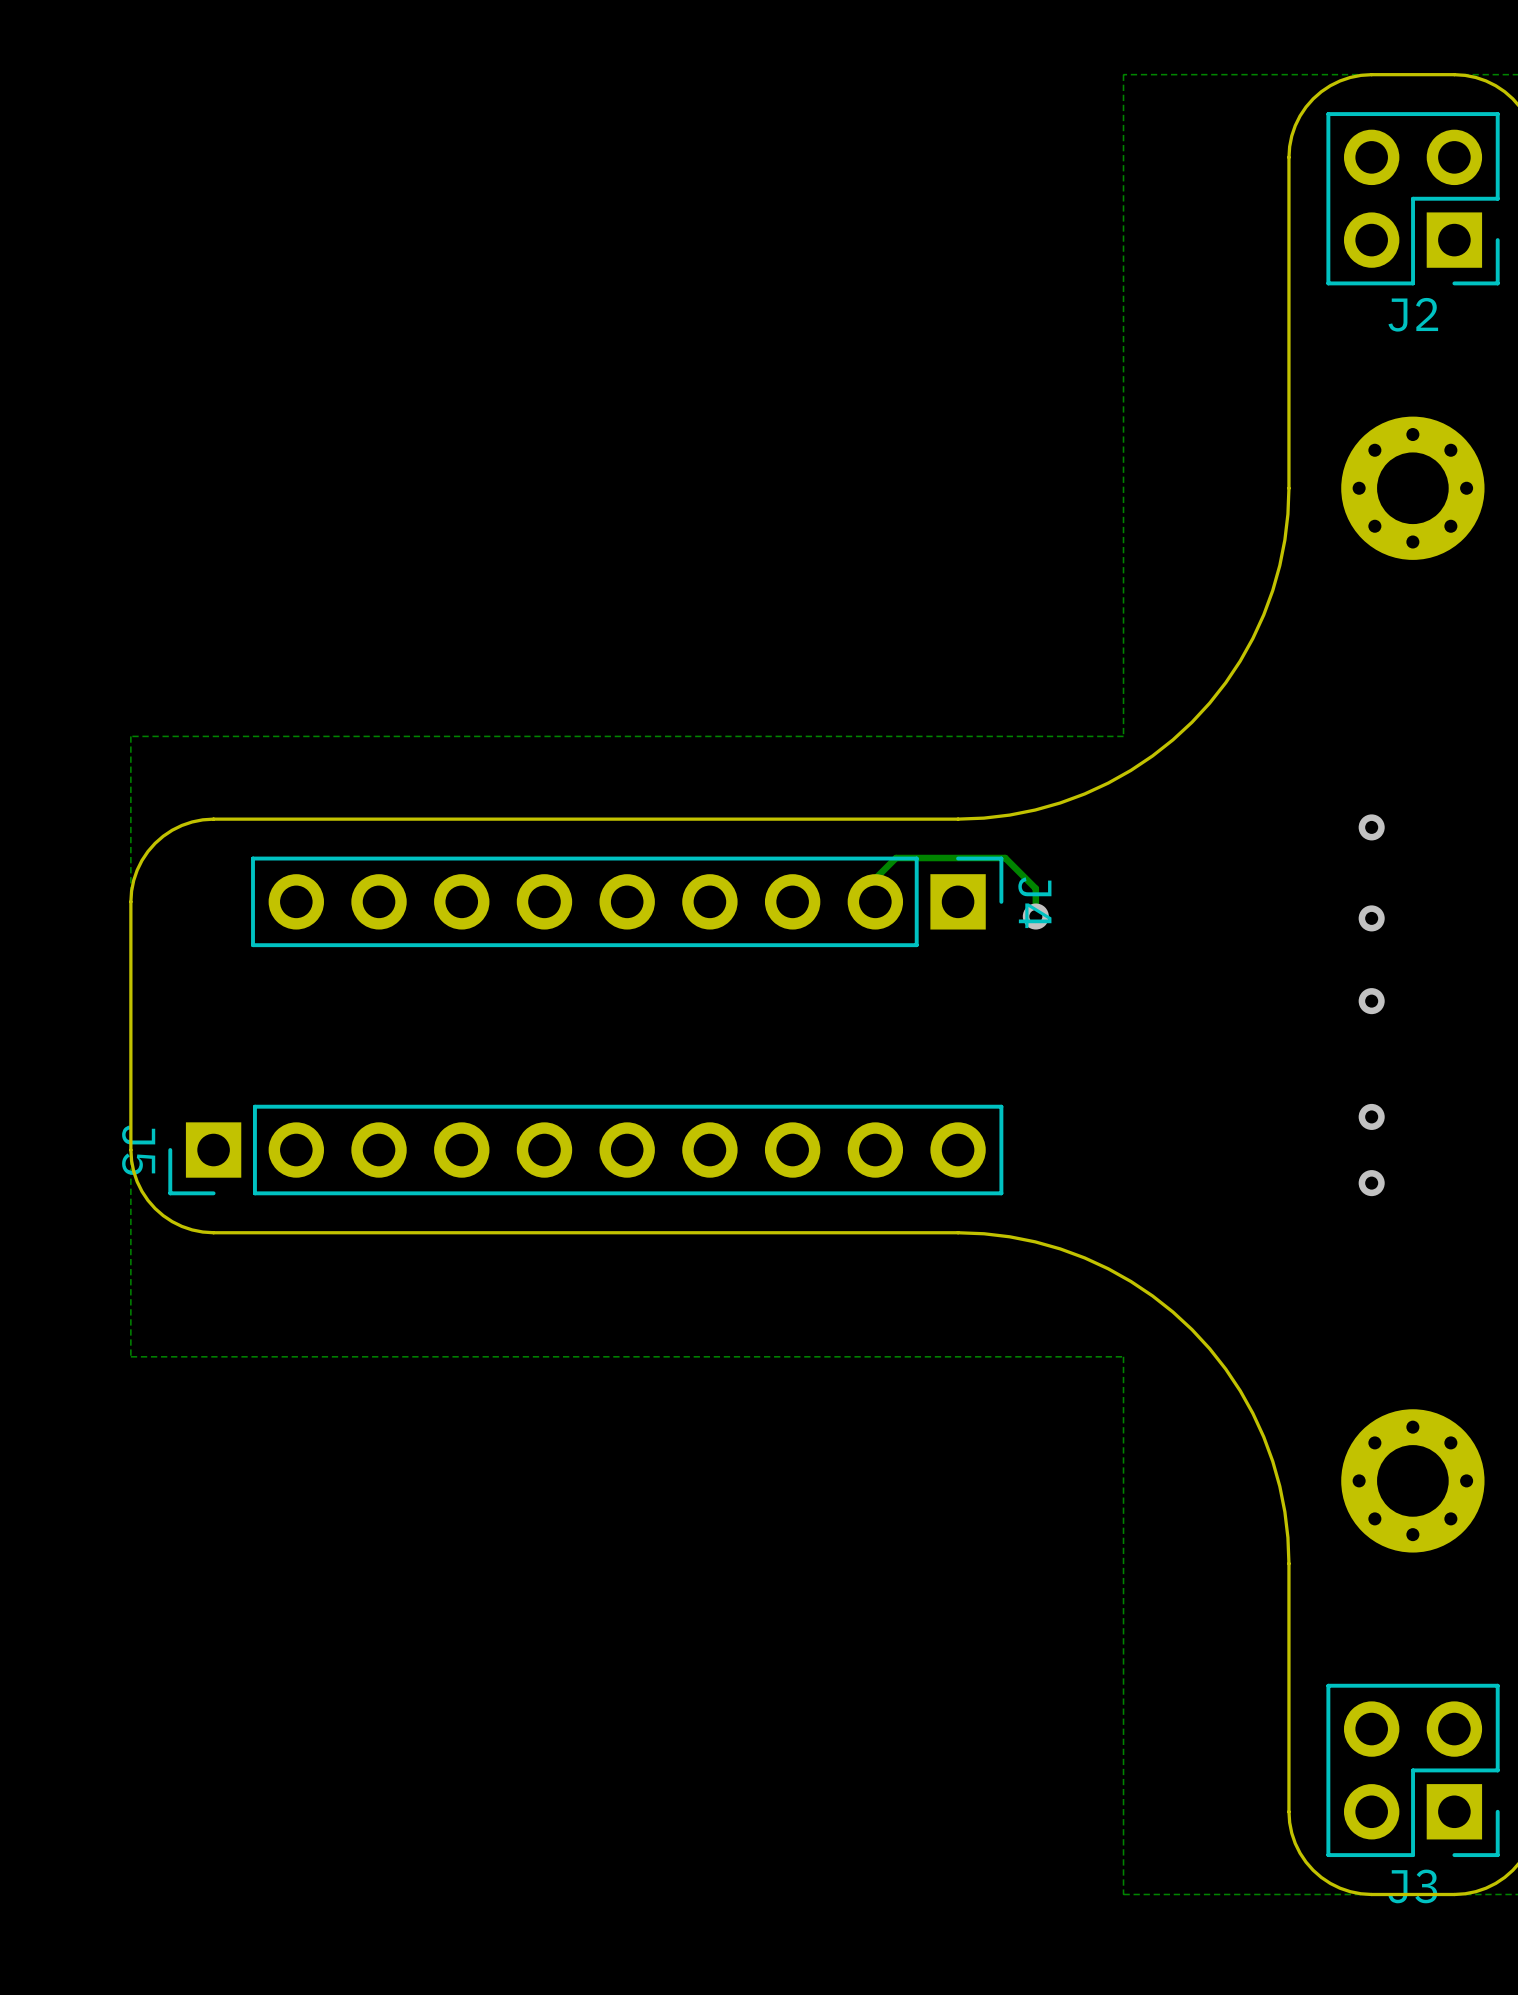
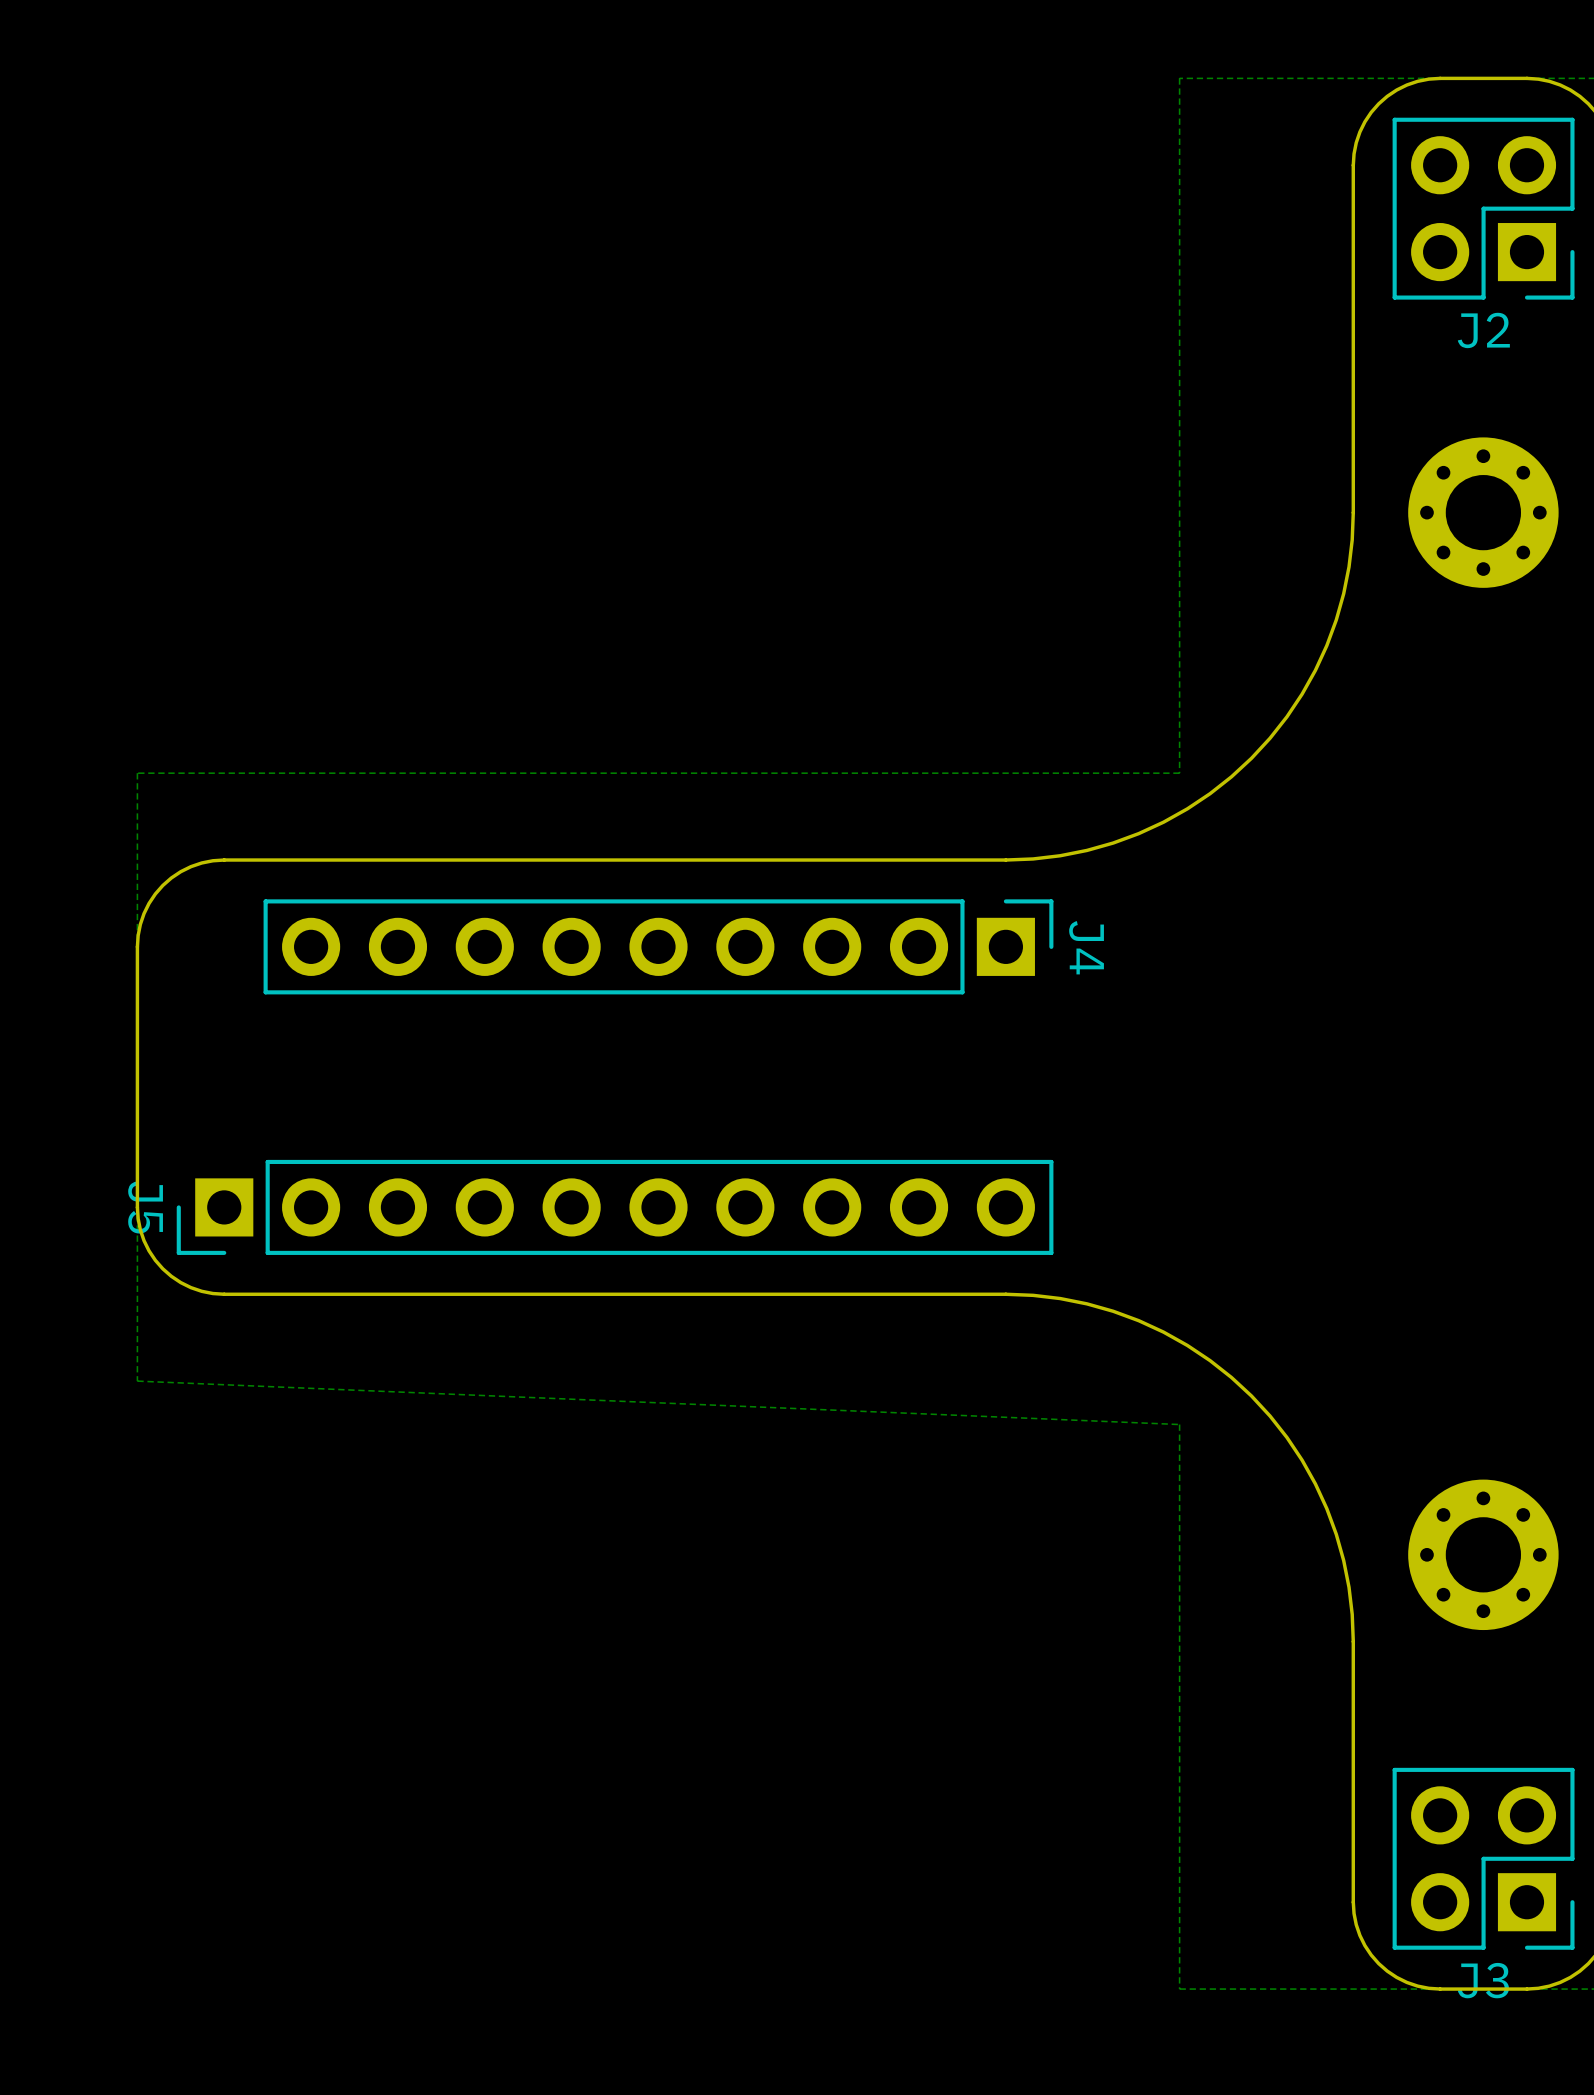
via: (1371, 827) -> none
track: (875, 901) (875, 878) (896, 858) (1005, 858) (1035, 888) (1035, 916) -> none
via: (1035, 916) -> none
via: (1371, 918) -> none
via: (1371, 1001) -> none
via: (1371, 1116) -> none
via: (1371, 1183) -> none
zone outline: (130, 1315) (130, 1356) (1123, 1356) -> (137, 1381) (1179, 1424)

